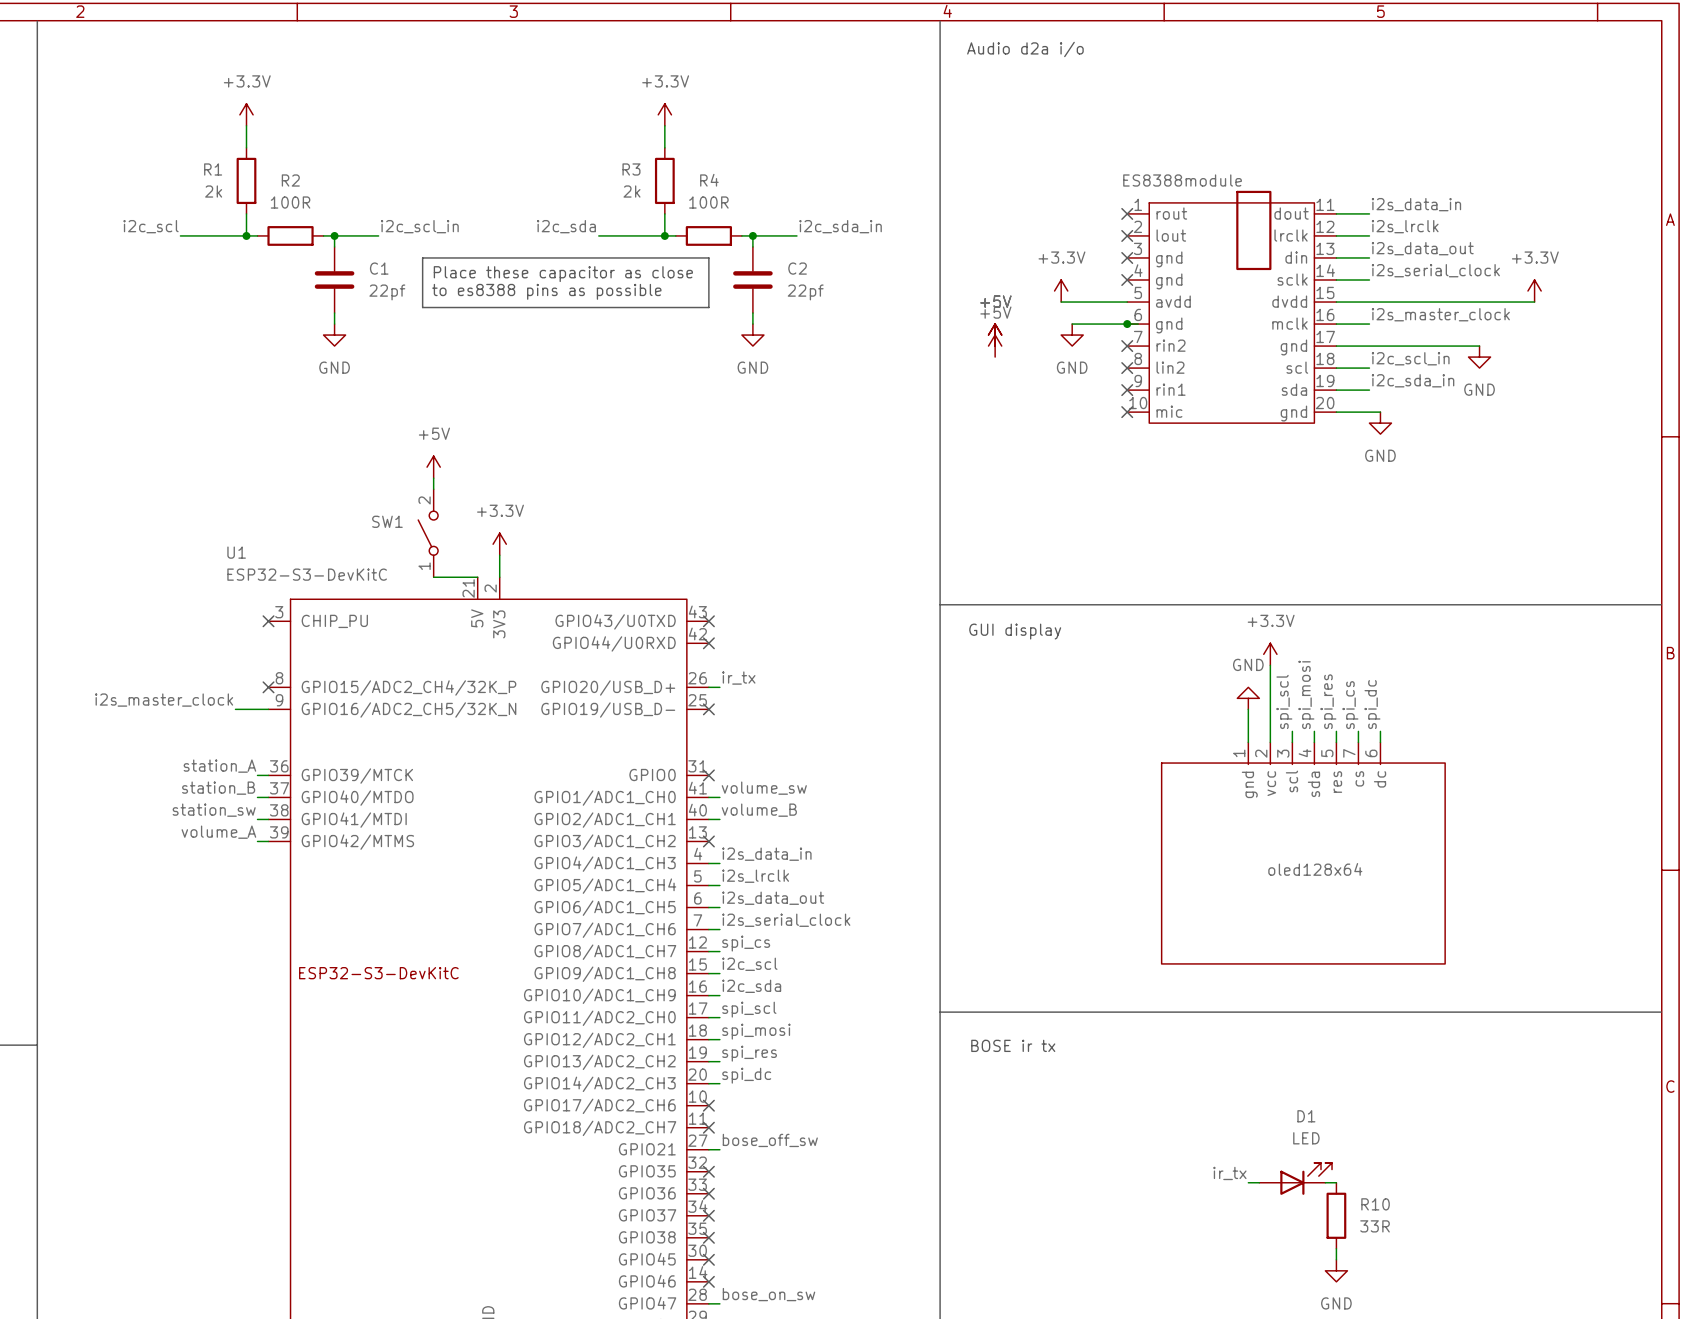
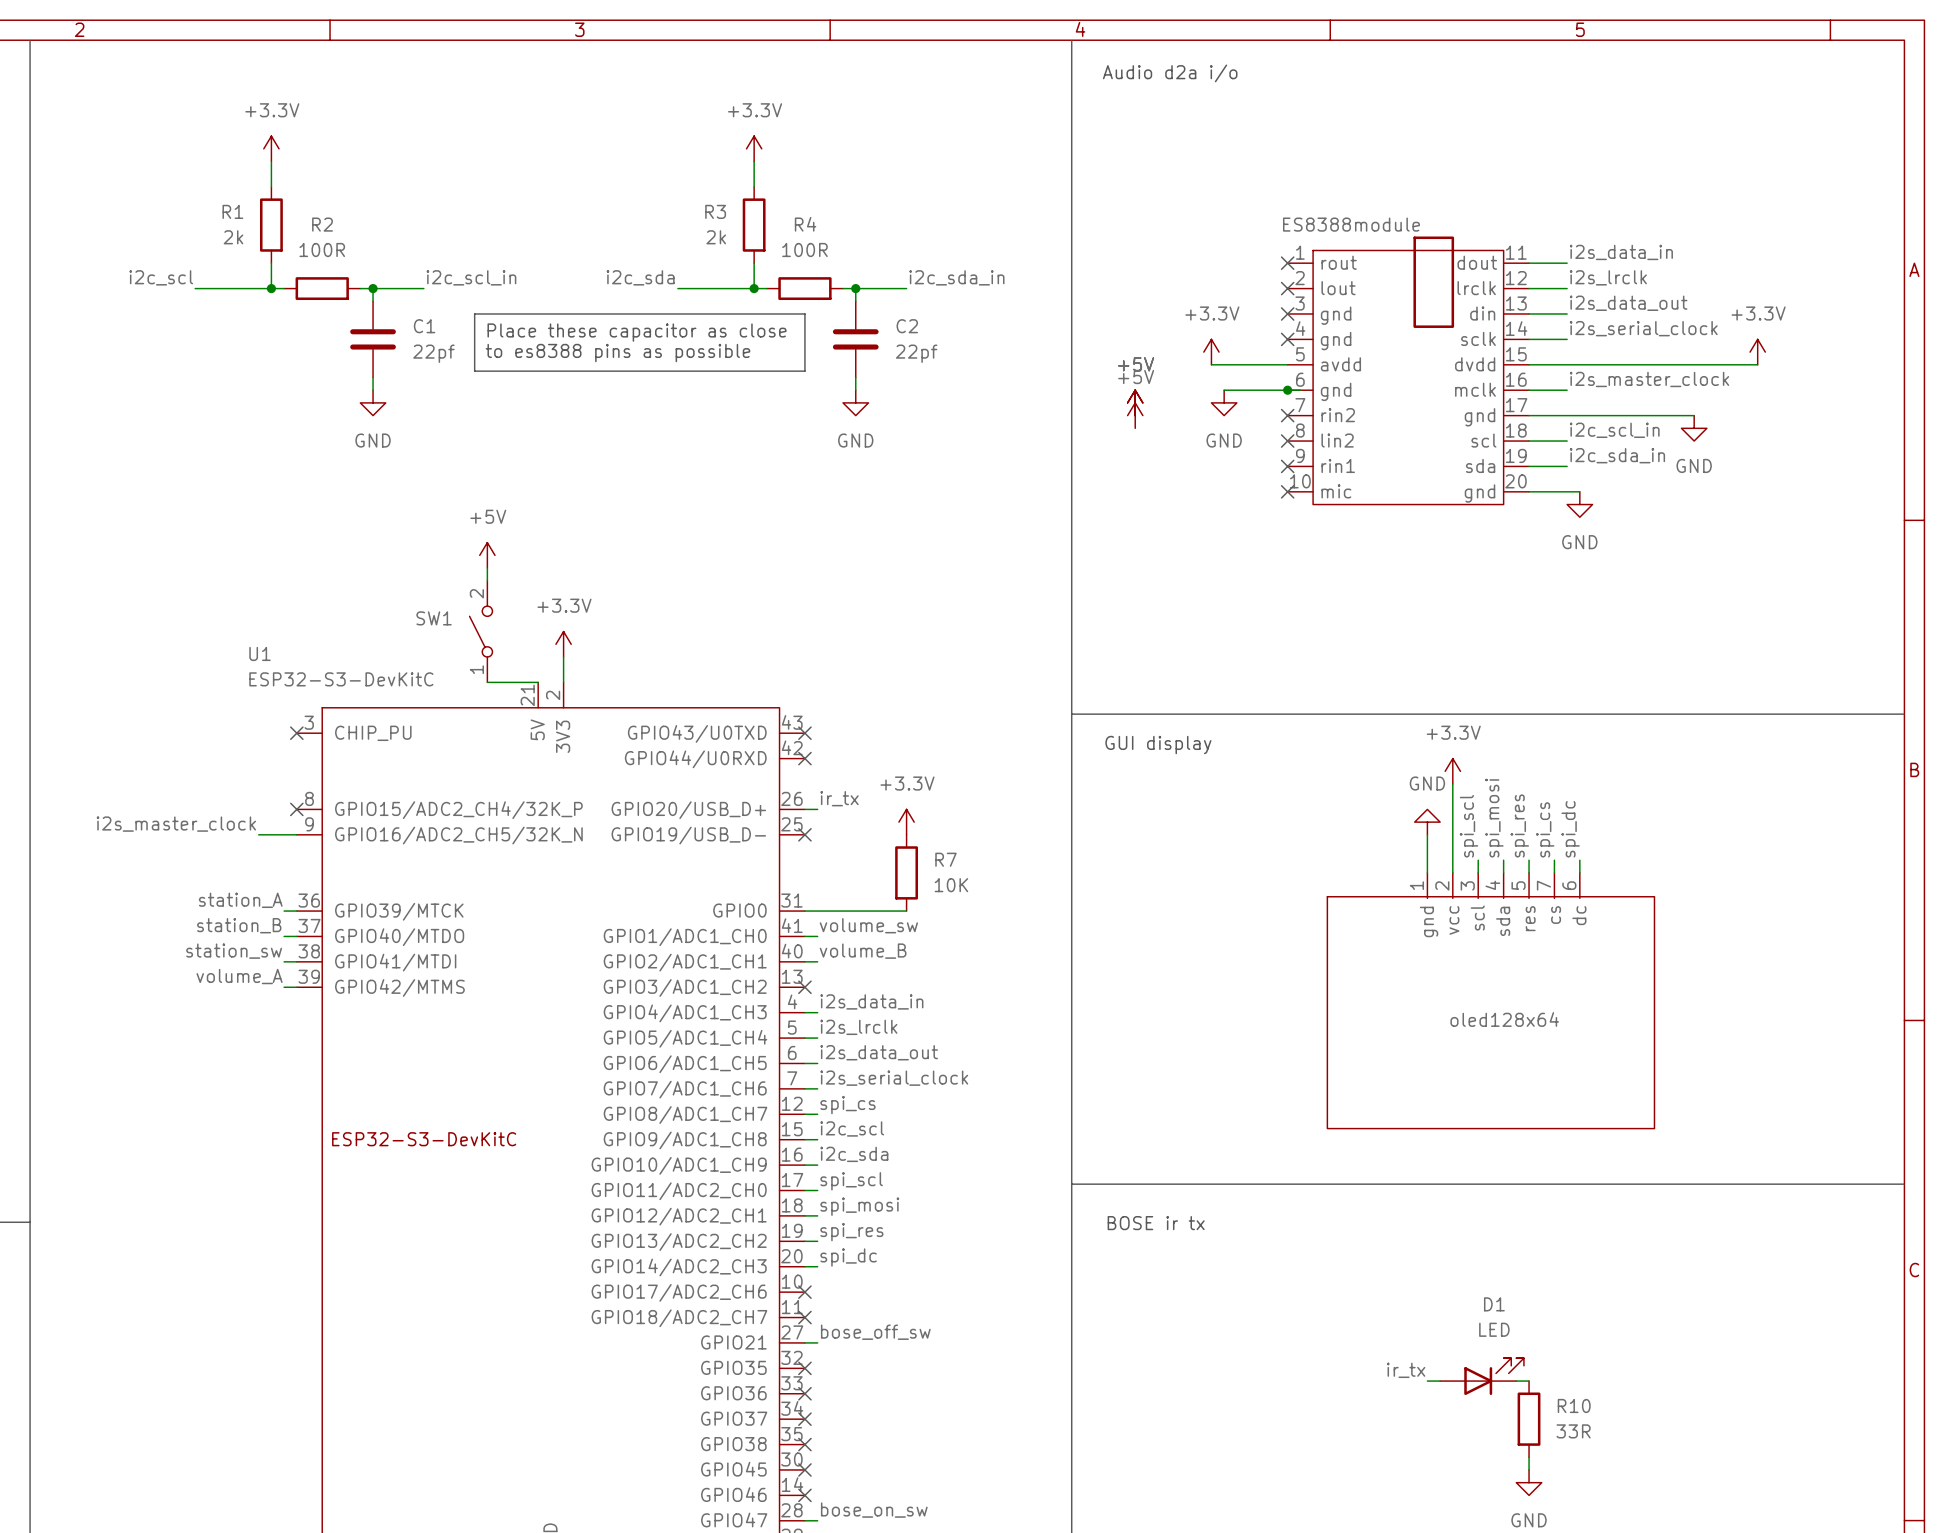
power symbol: none -> +3.3V (906, 822)
R7: none -> 10K (906, 872)
wire: none -> (804, 911) (906, 911)
no-connect mark: (708, 775) -> none

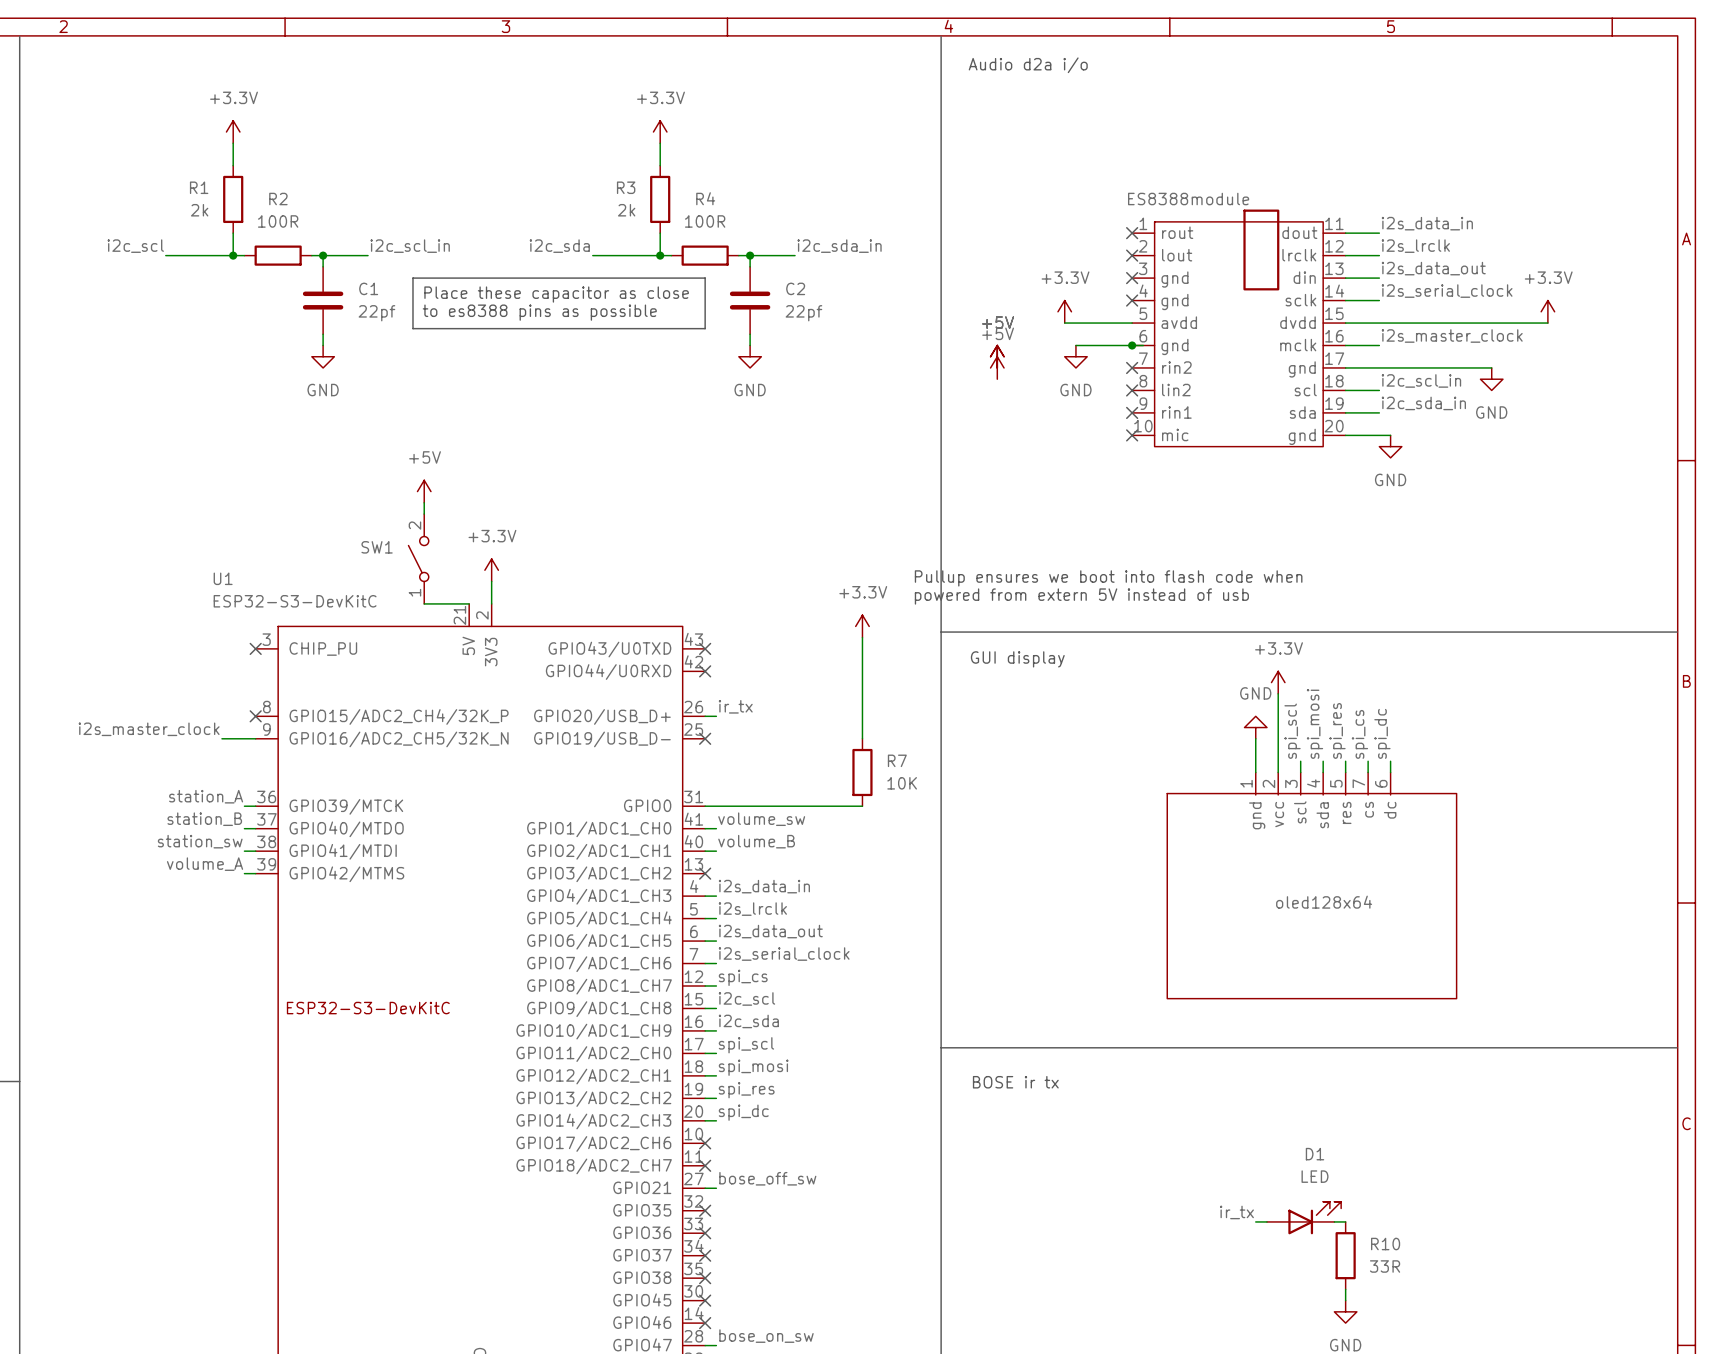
text: none -> Pullup ensures we boot into flash code when (1108, 578)
text: none -> powered from extern 5V instead of usb (1081, 596)
wire: none -> (862, 637) (862, 738)
power symbol position: +3.3V (906, 822) -> +3.3V (862, 626)
R7 position: (906, 872) -> (862, 772)
wire: none -> (795, 806) (862, 806)

